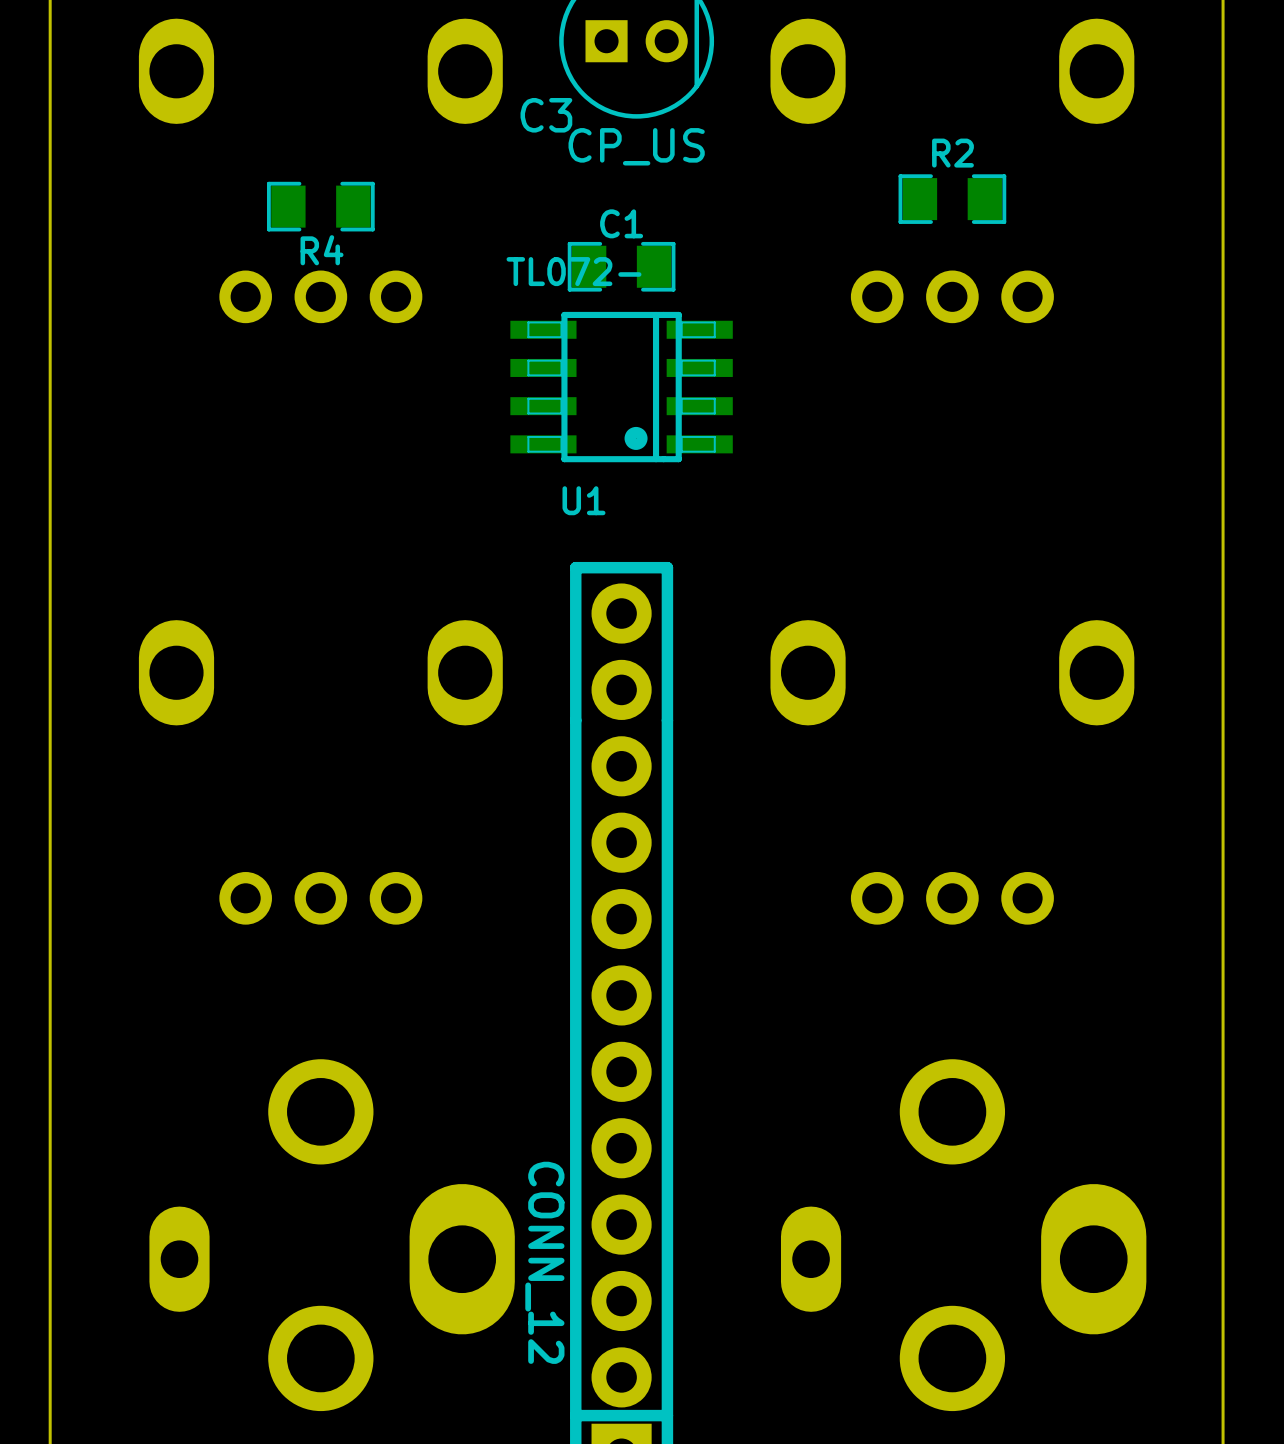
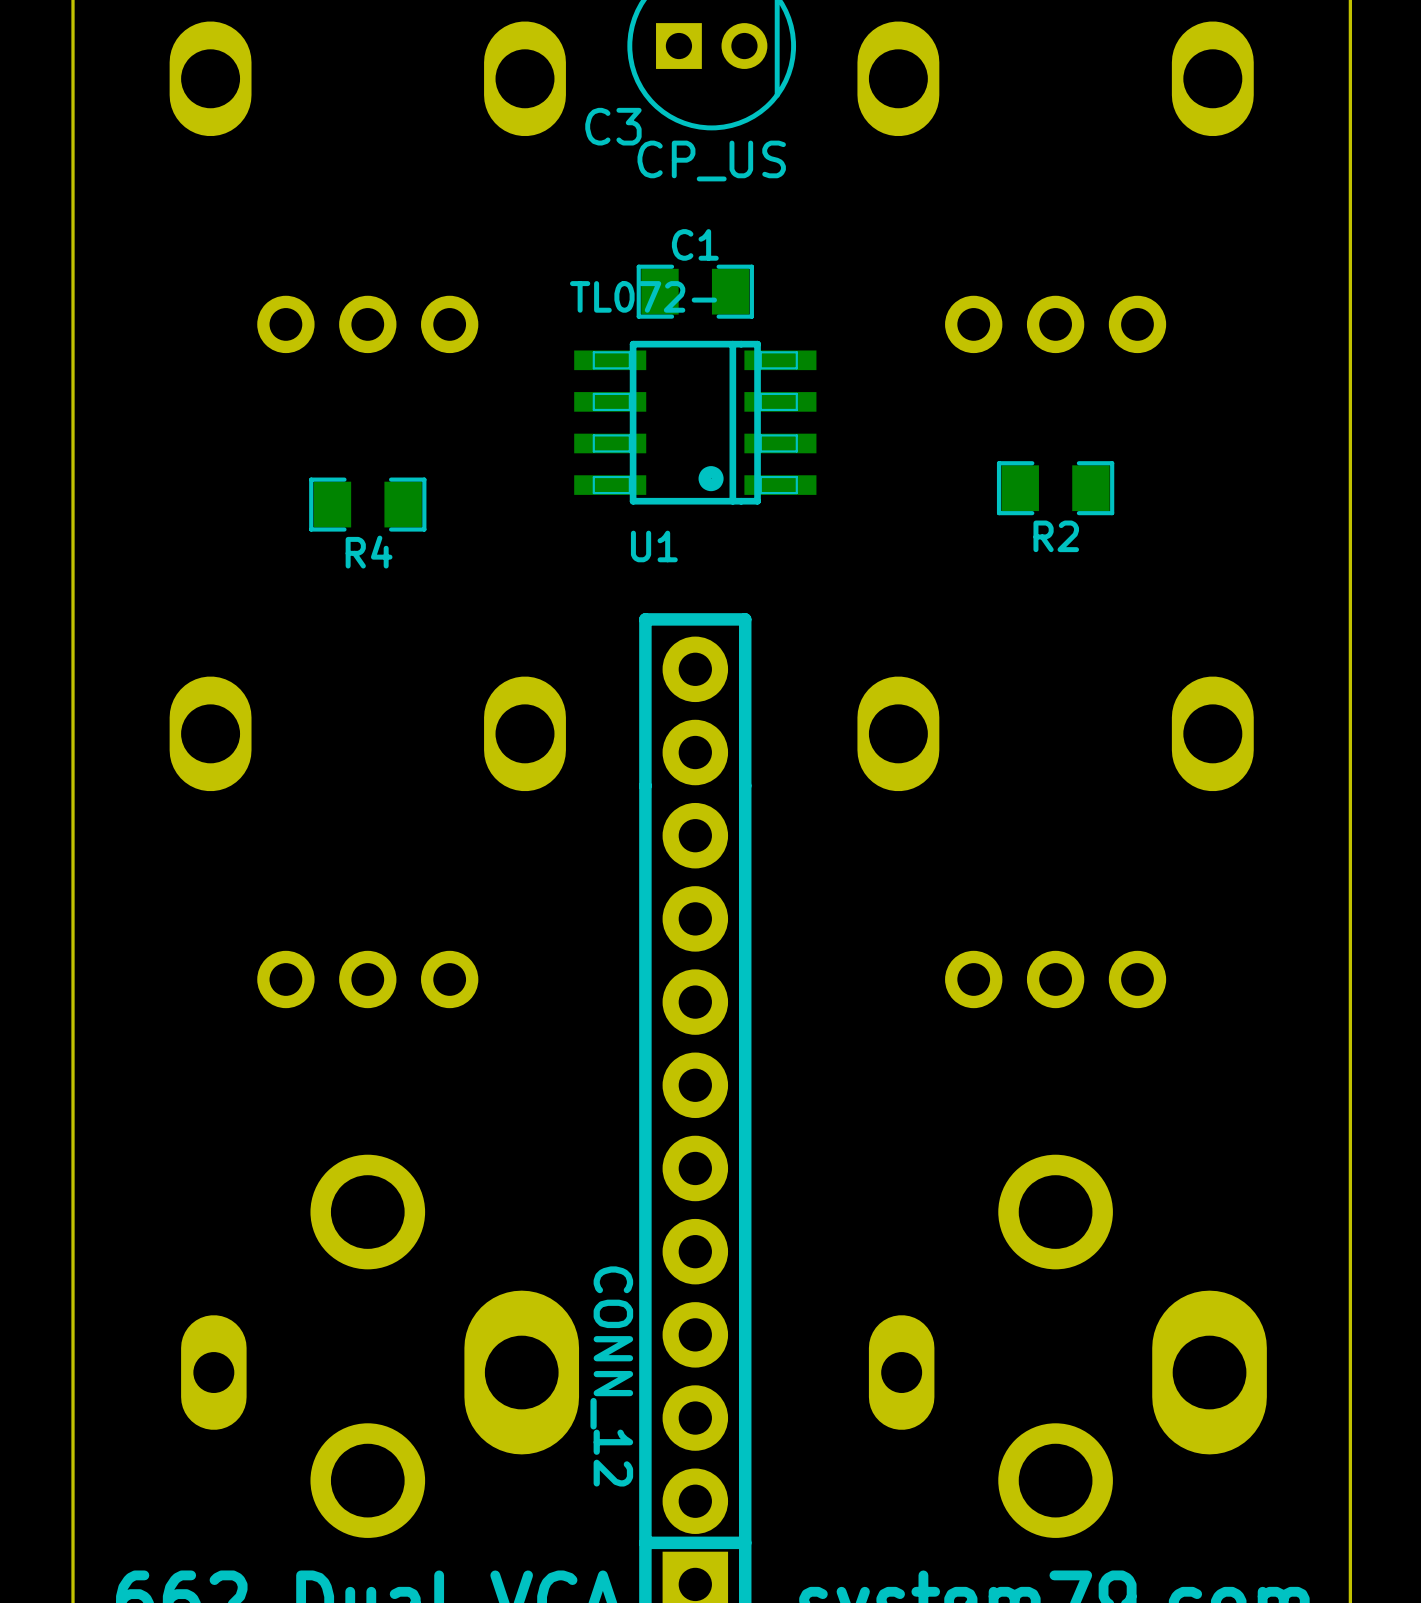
R2 name position: R2 (952, 153) -> R2 (1056, 536)
R2 position: (952, 199) -> (1055, 488)
R4 position: (320, 206) -> (367, 504)

